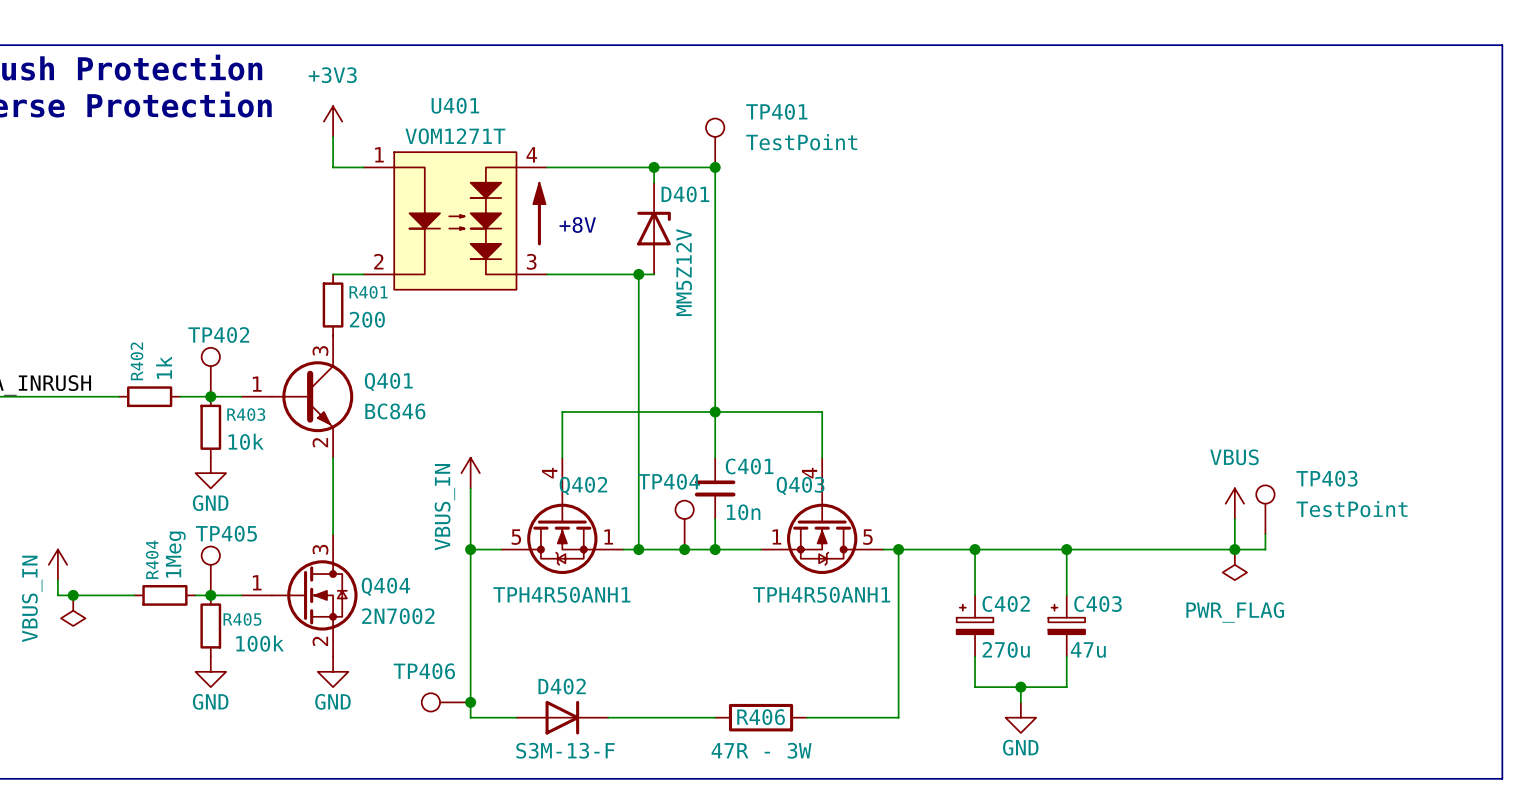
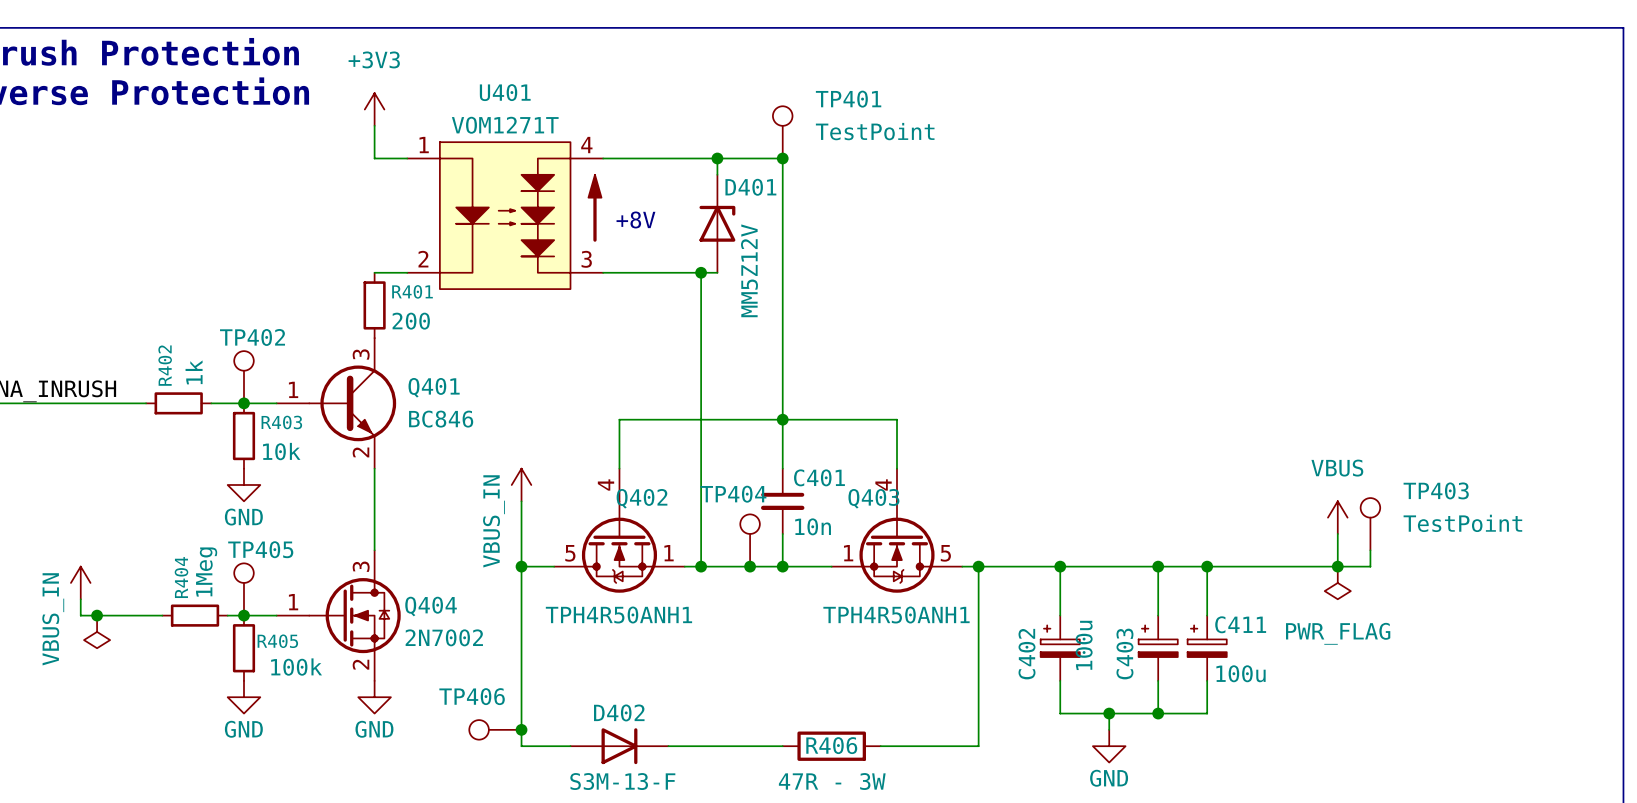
wire: none -> (1207, 566) (1207, 615)
junction: none -> (1207, 566)
C402 name rotation: 0° (1006, 604) -> 90° counterclockwise (1027, 654)
C402 name position: C402 (1006, 604) -> C402 (1027, 654)
C403 name rotation: 0° (1098, 604) -> 90° counterclockwise (1124, 654)
C403 name position: C403 (1098, 604) -> C403 (1124, 654)
C411: none -> 100u (1207, 648)
C402 value: 270u (1006, 649) -> 100u (1084, 645)
C403 value: 47u (1088, 650) -> none
wire: none -> (1207, 680) (1207, 713) (1158, 713)
junction: none -> (1158, 713)

